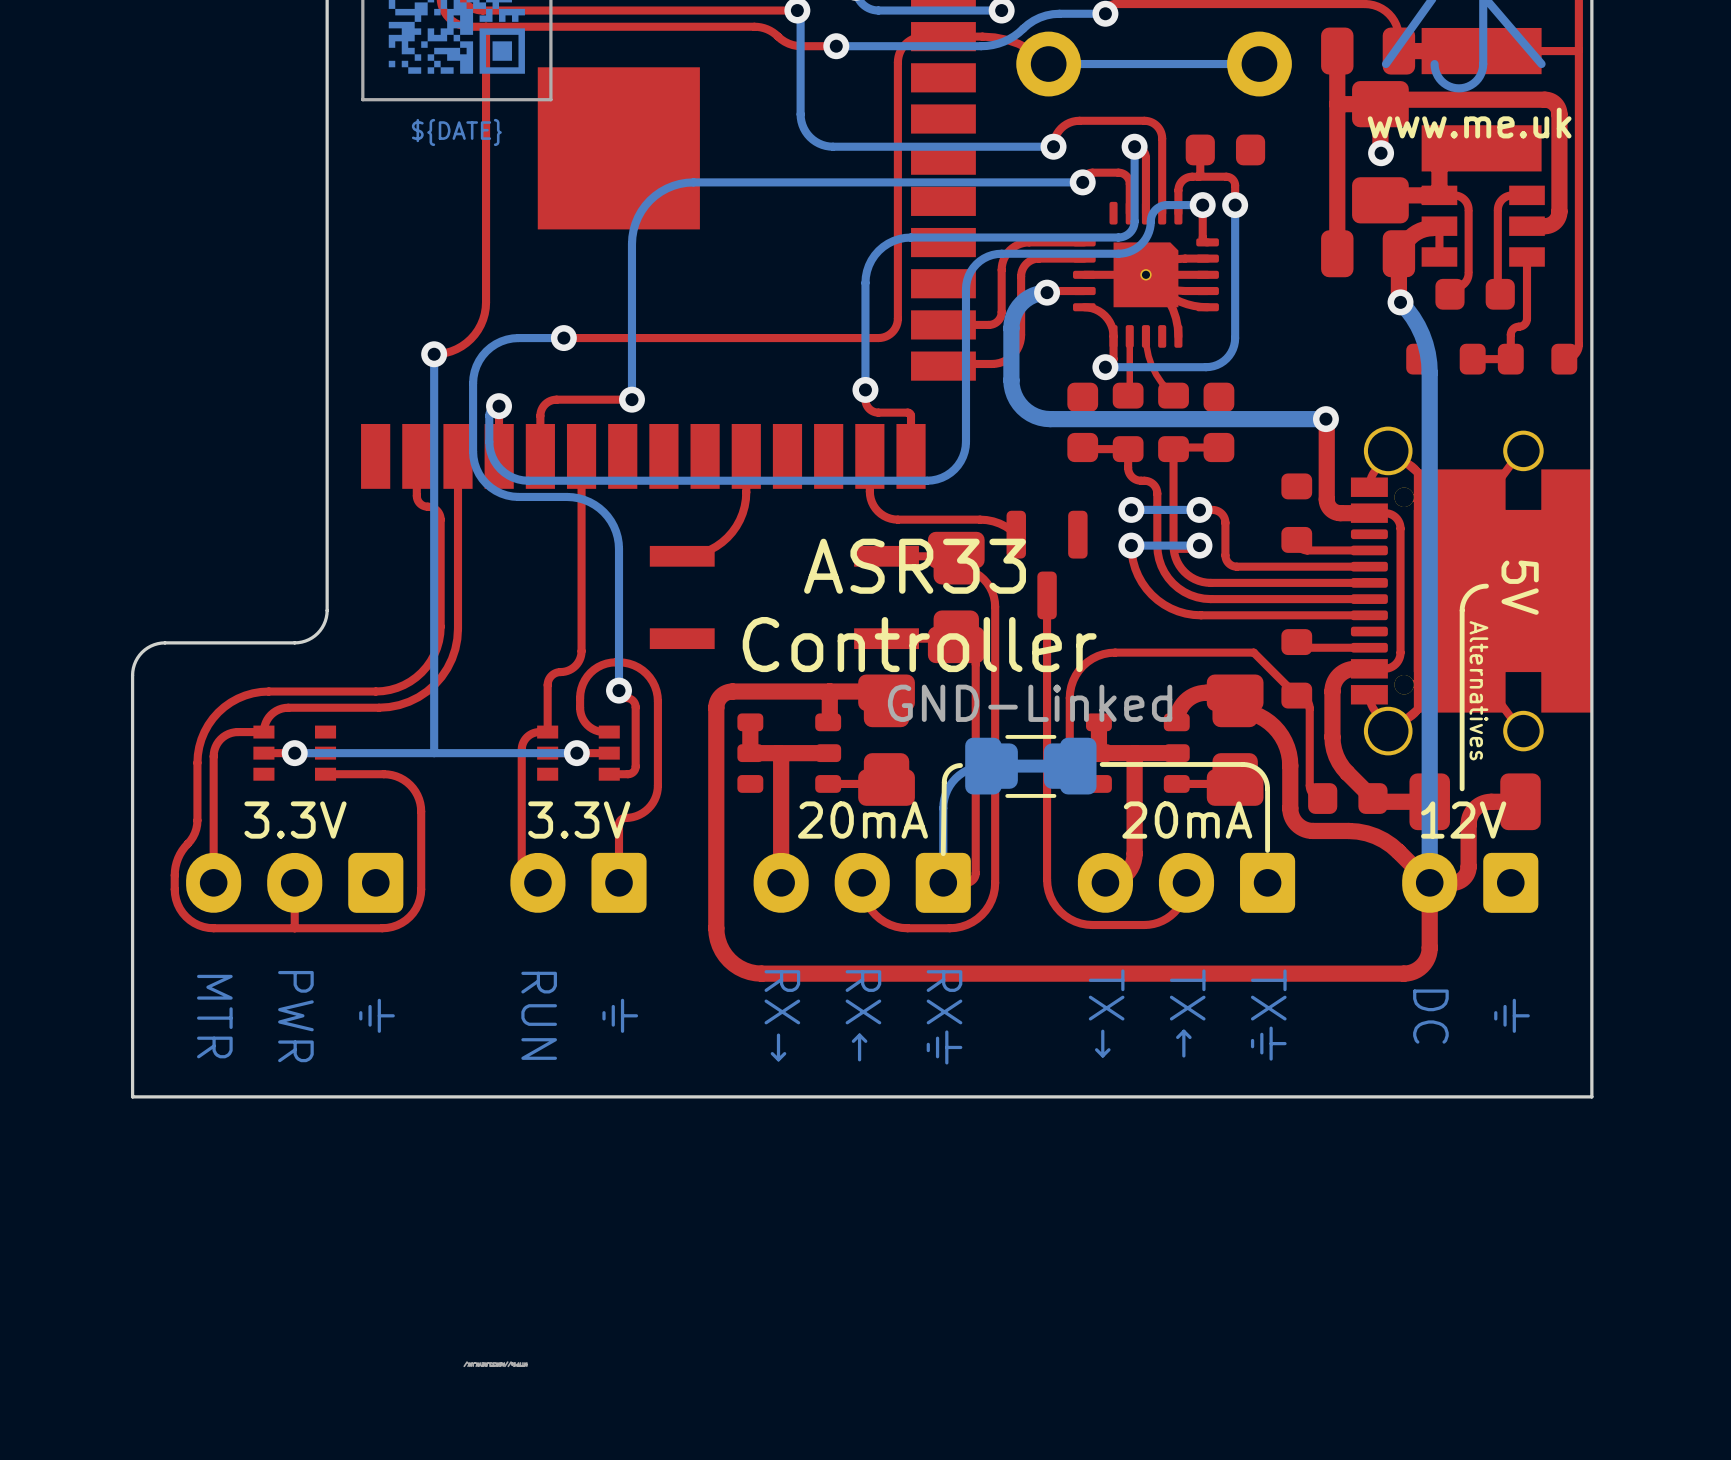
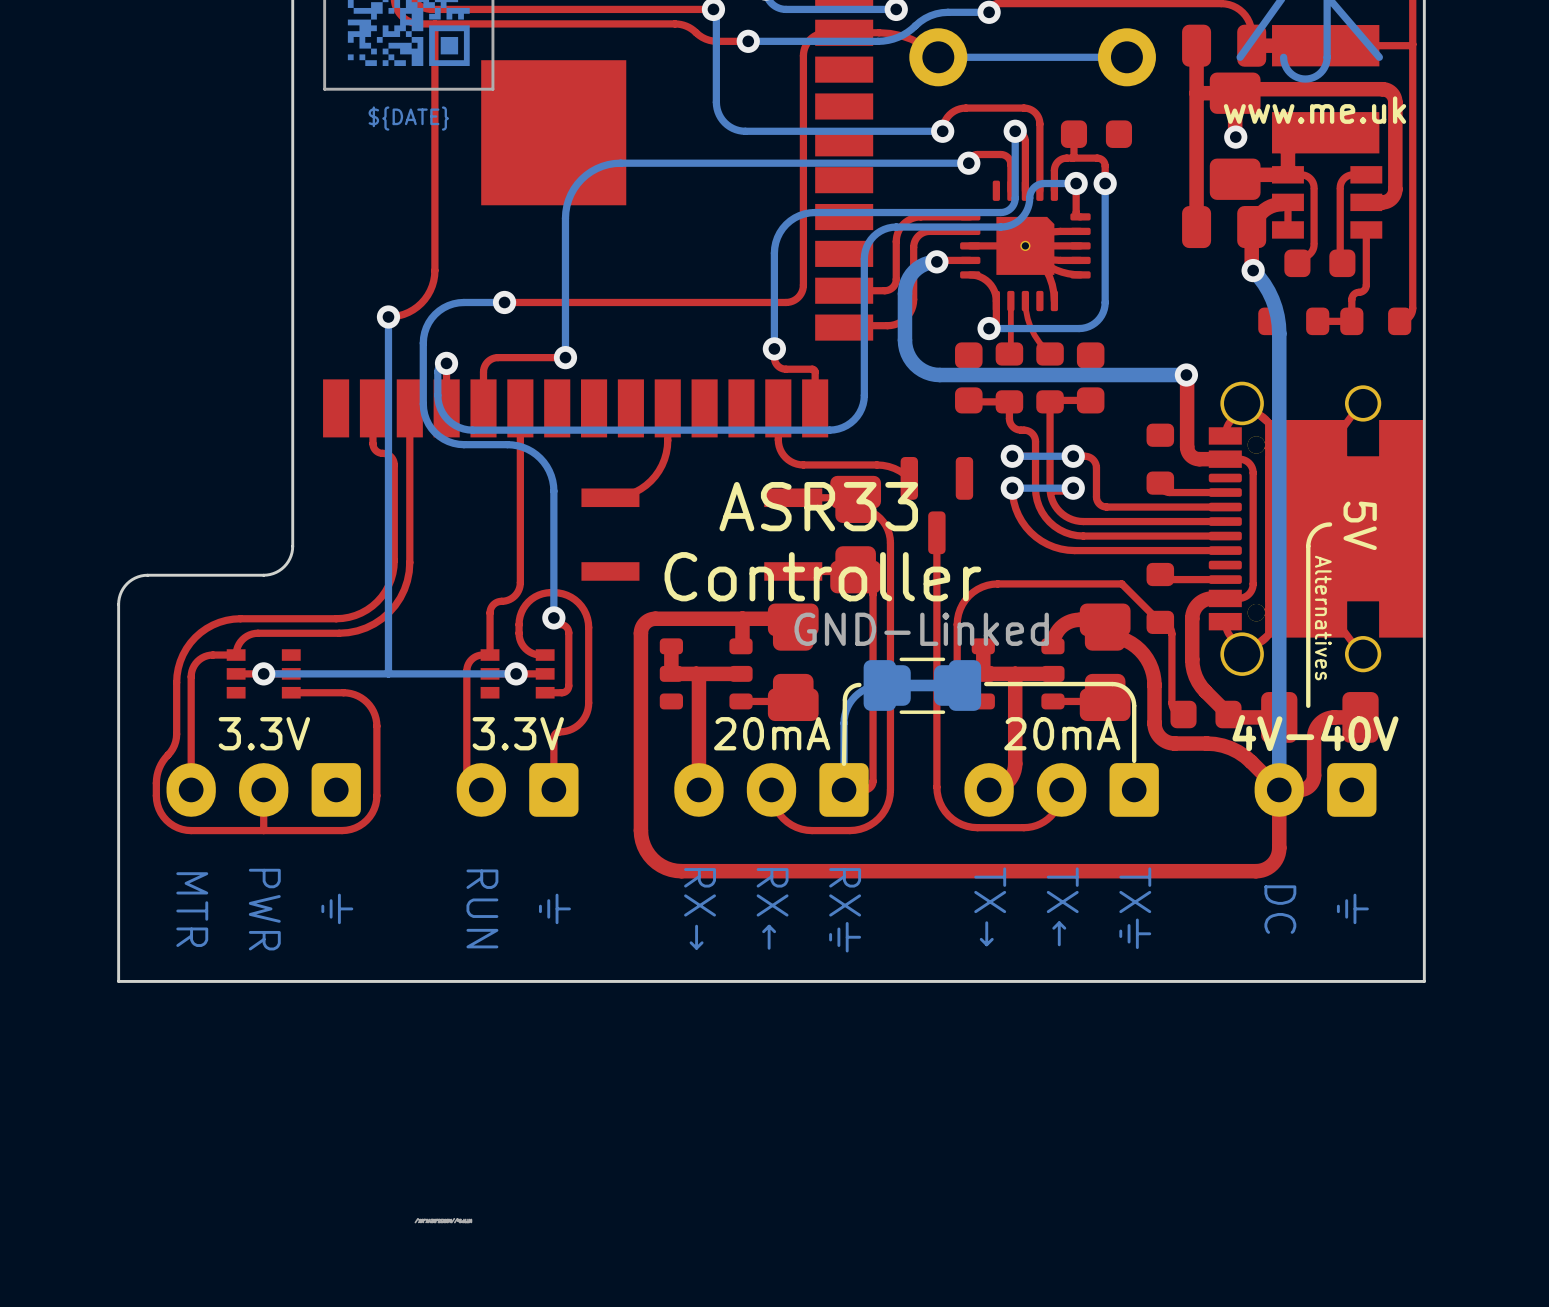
text: 12V (1463, 820) -> 4V-40V (1315, 733)

